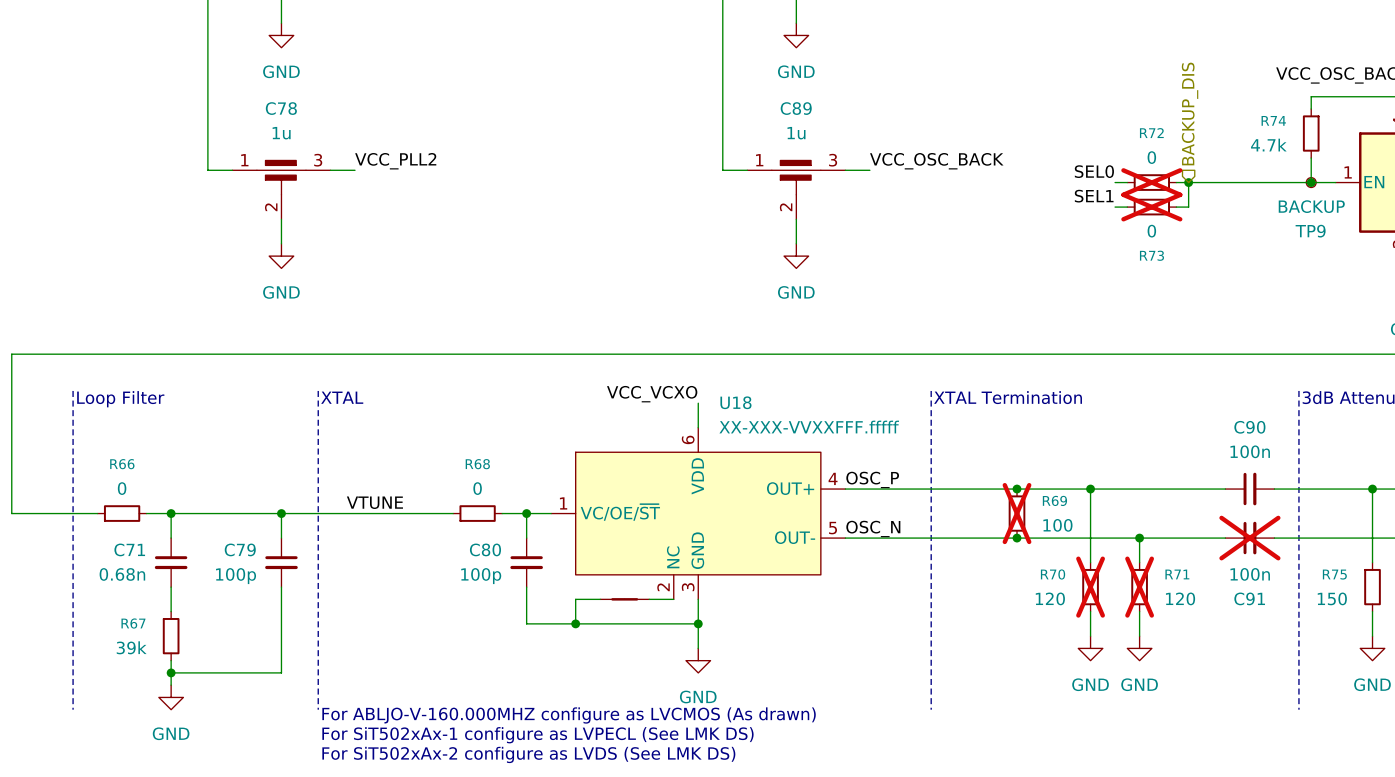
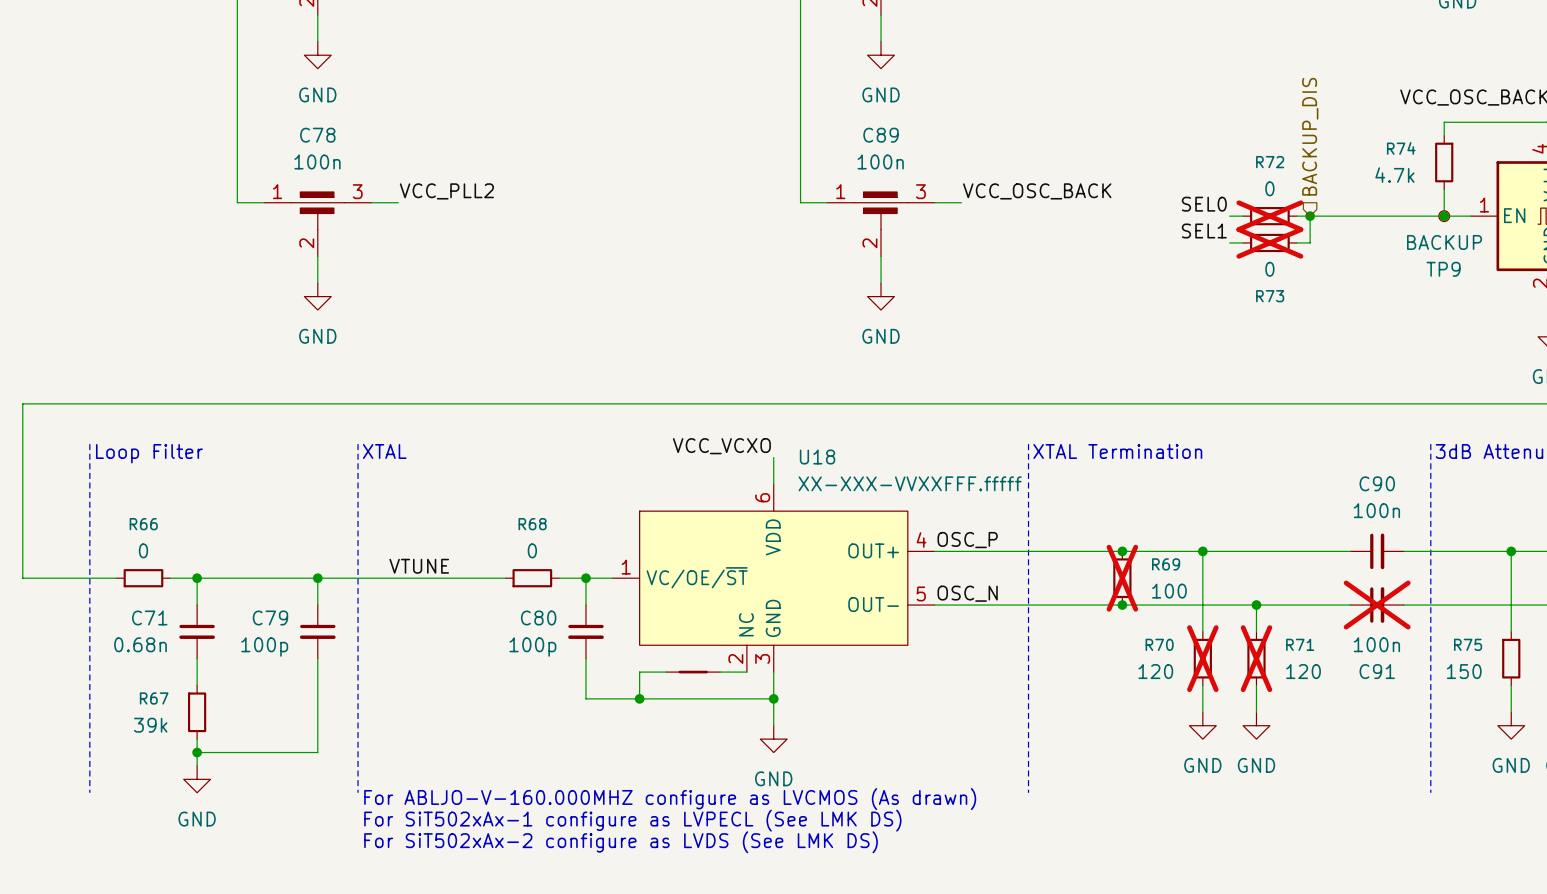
C78 value: 1u (281, 133) -> 100n (317, 162)
C89 value: 1u (796, 133) -> 100n (880, 162)

